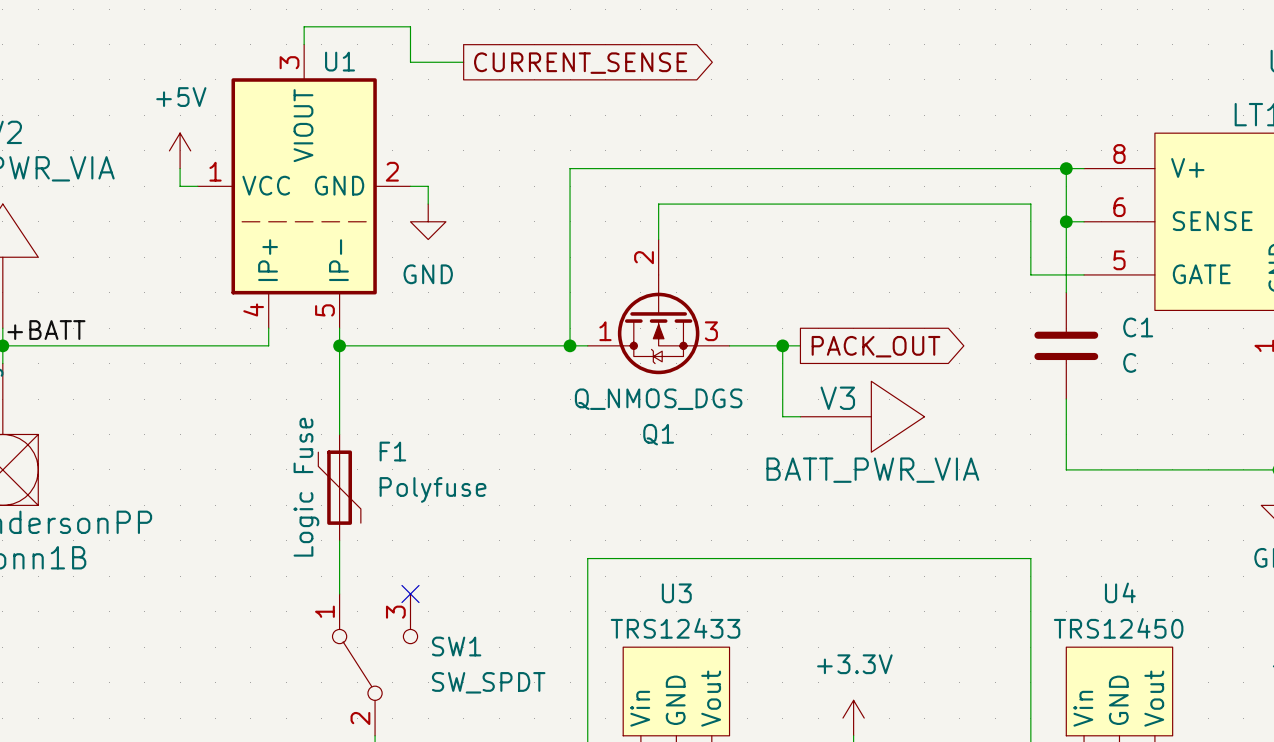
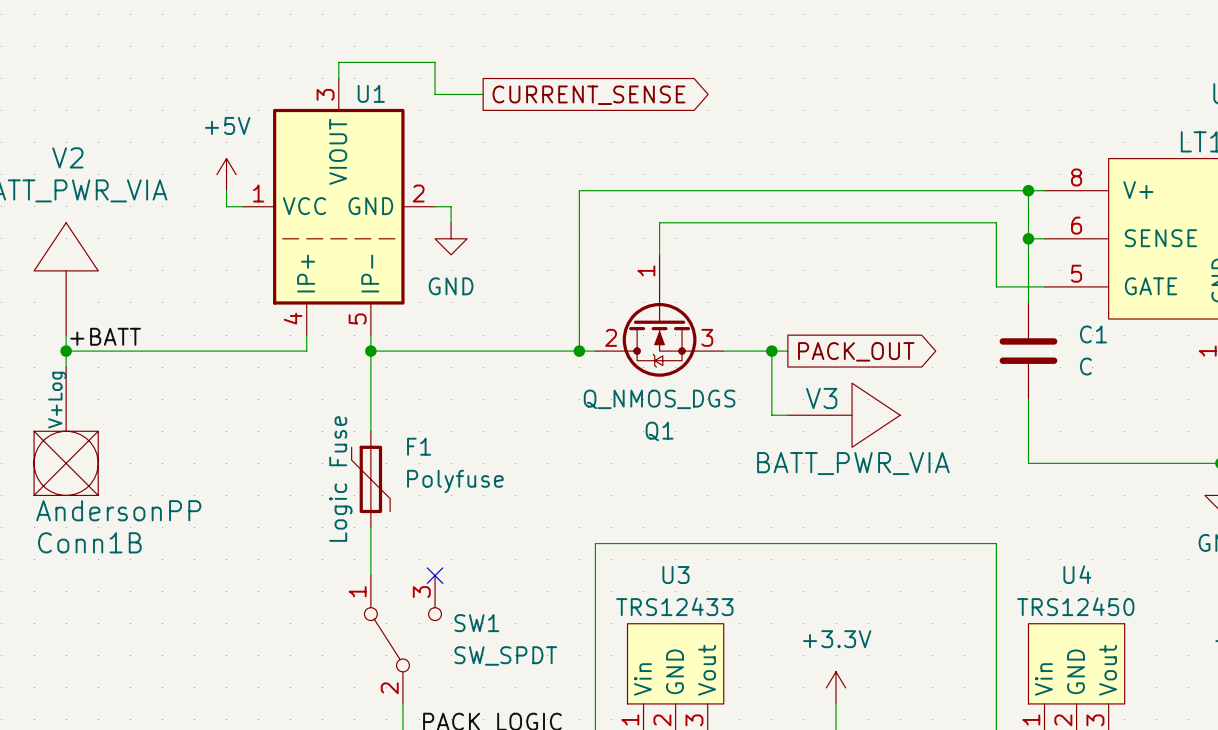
Q1 pin number: 2 (644, 257) -> 1 (646, 270)
Q1 pin number: 1 (605, 331) -> 2 (611, 337)

